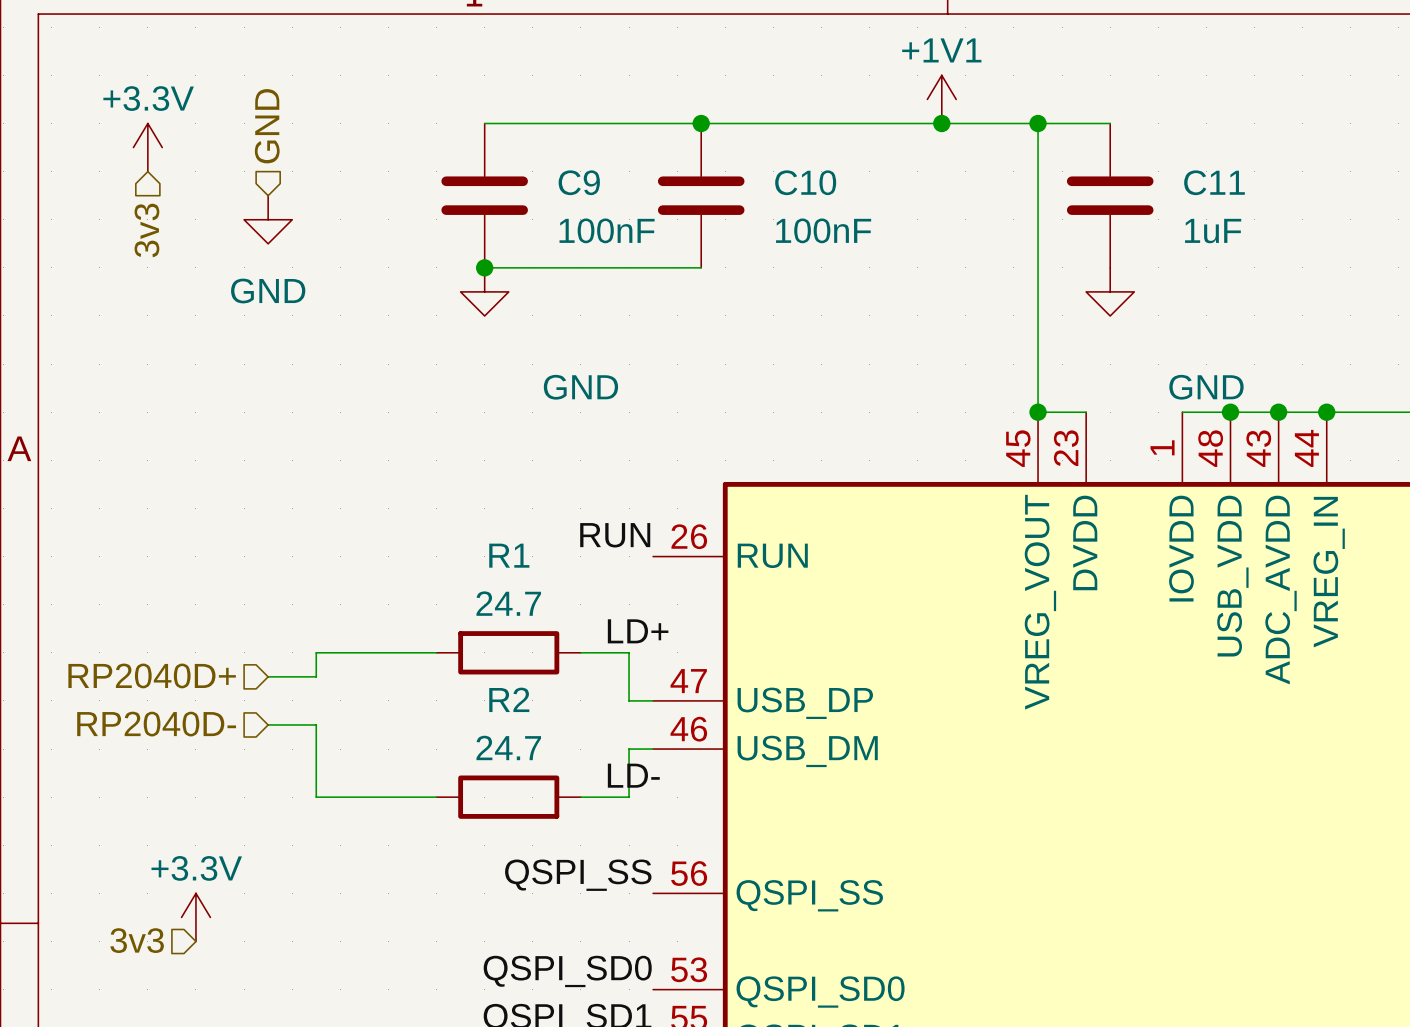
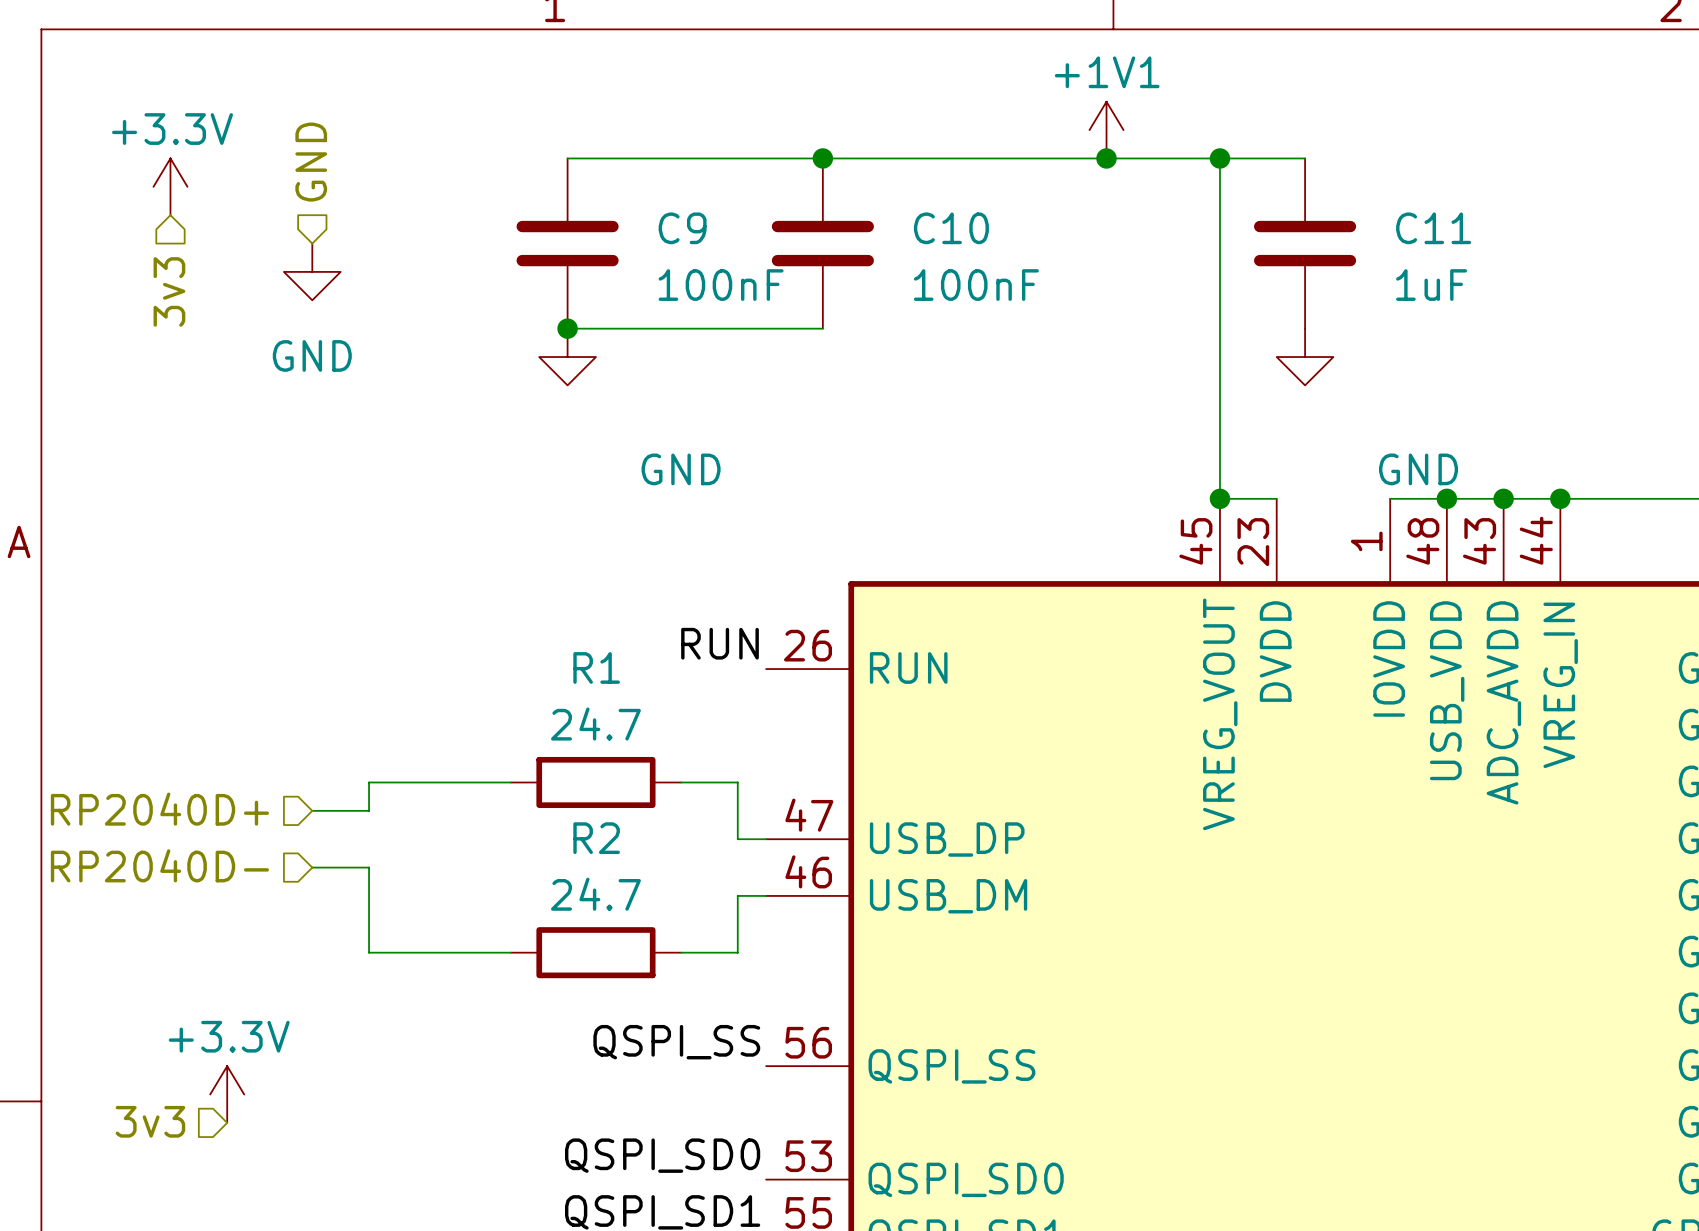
label: LD+ (638, 631) -> none
label: LD- (633, 775) -> none

